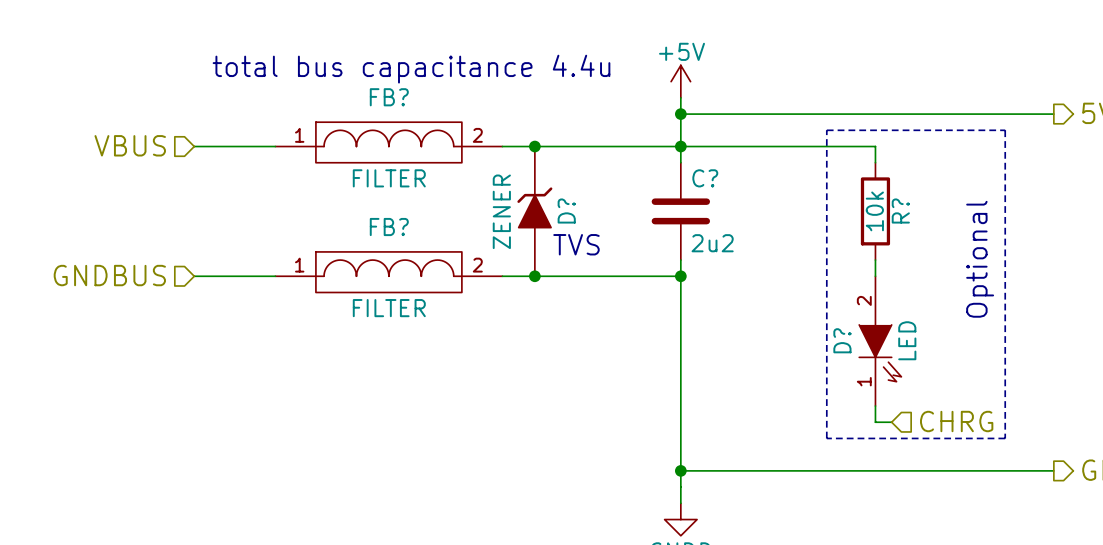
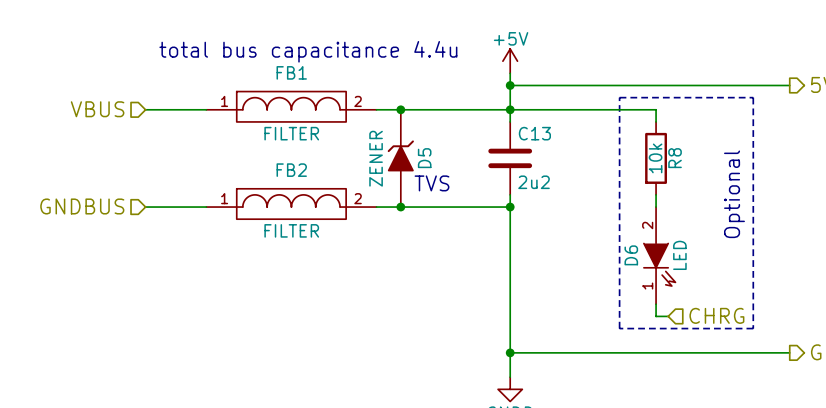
FB? name: FB? (389, 97) -> FB1 (291, 72)
C? name: C? (705, 178) -> C13 (534, 133)
D? name: D? (566, 211) -> D5 (424, 158)
R? name: R? (900, 211) -> R8 (675, 158)
FB? name: FB? (389, 227) -> FB2 (291, 170)
D? name: D? (842, 340) -> D6 (631, 255)

